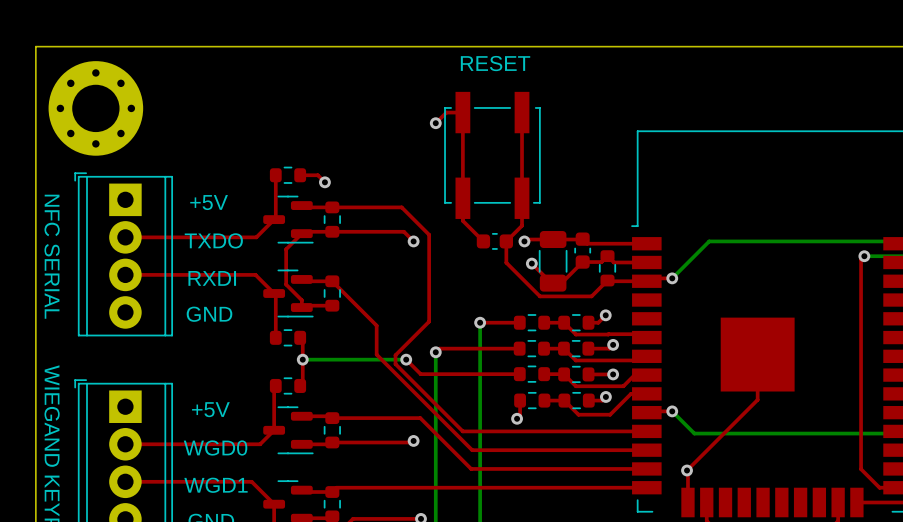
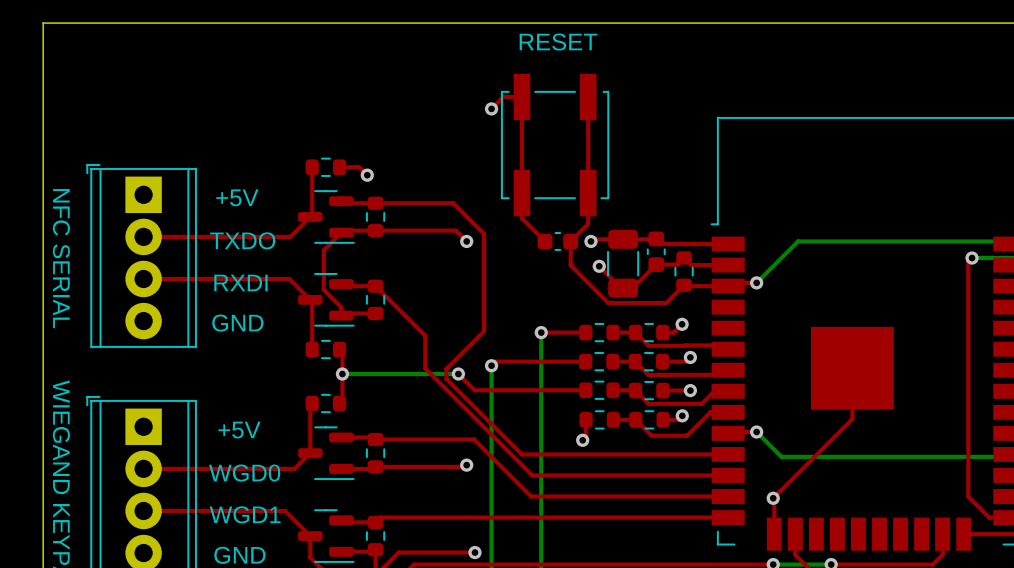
part: (95, 108) -> none

